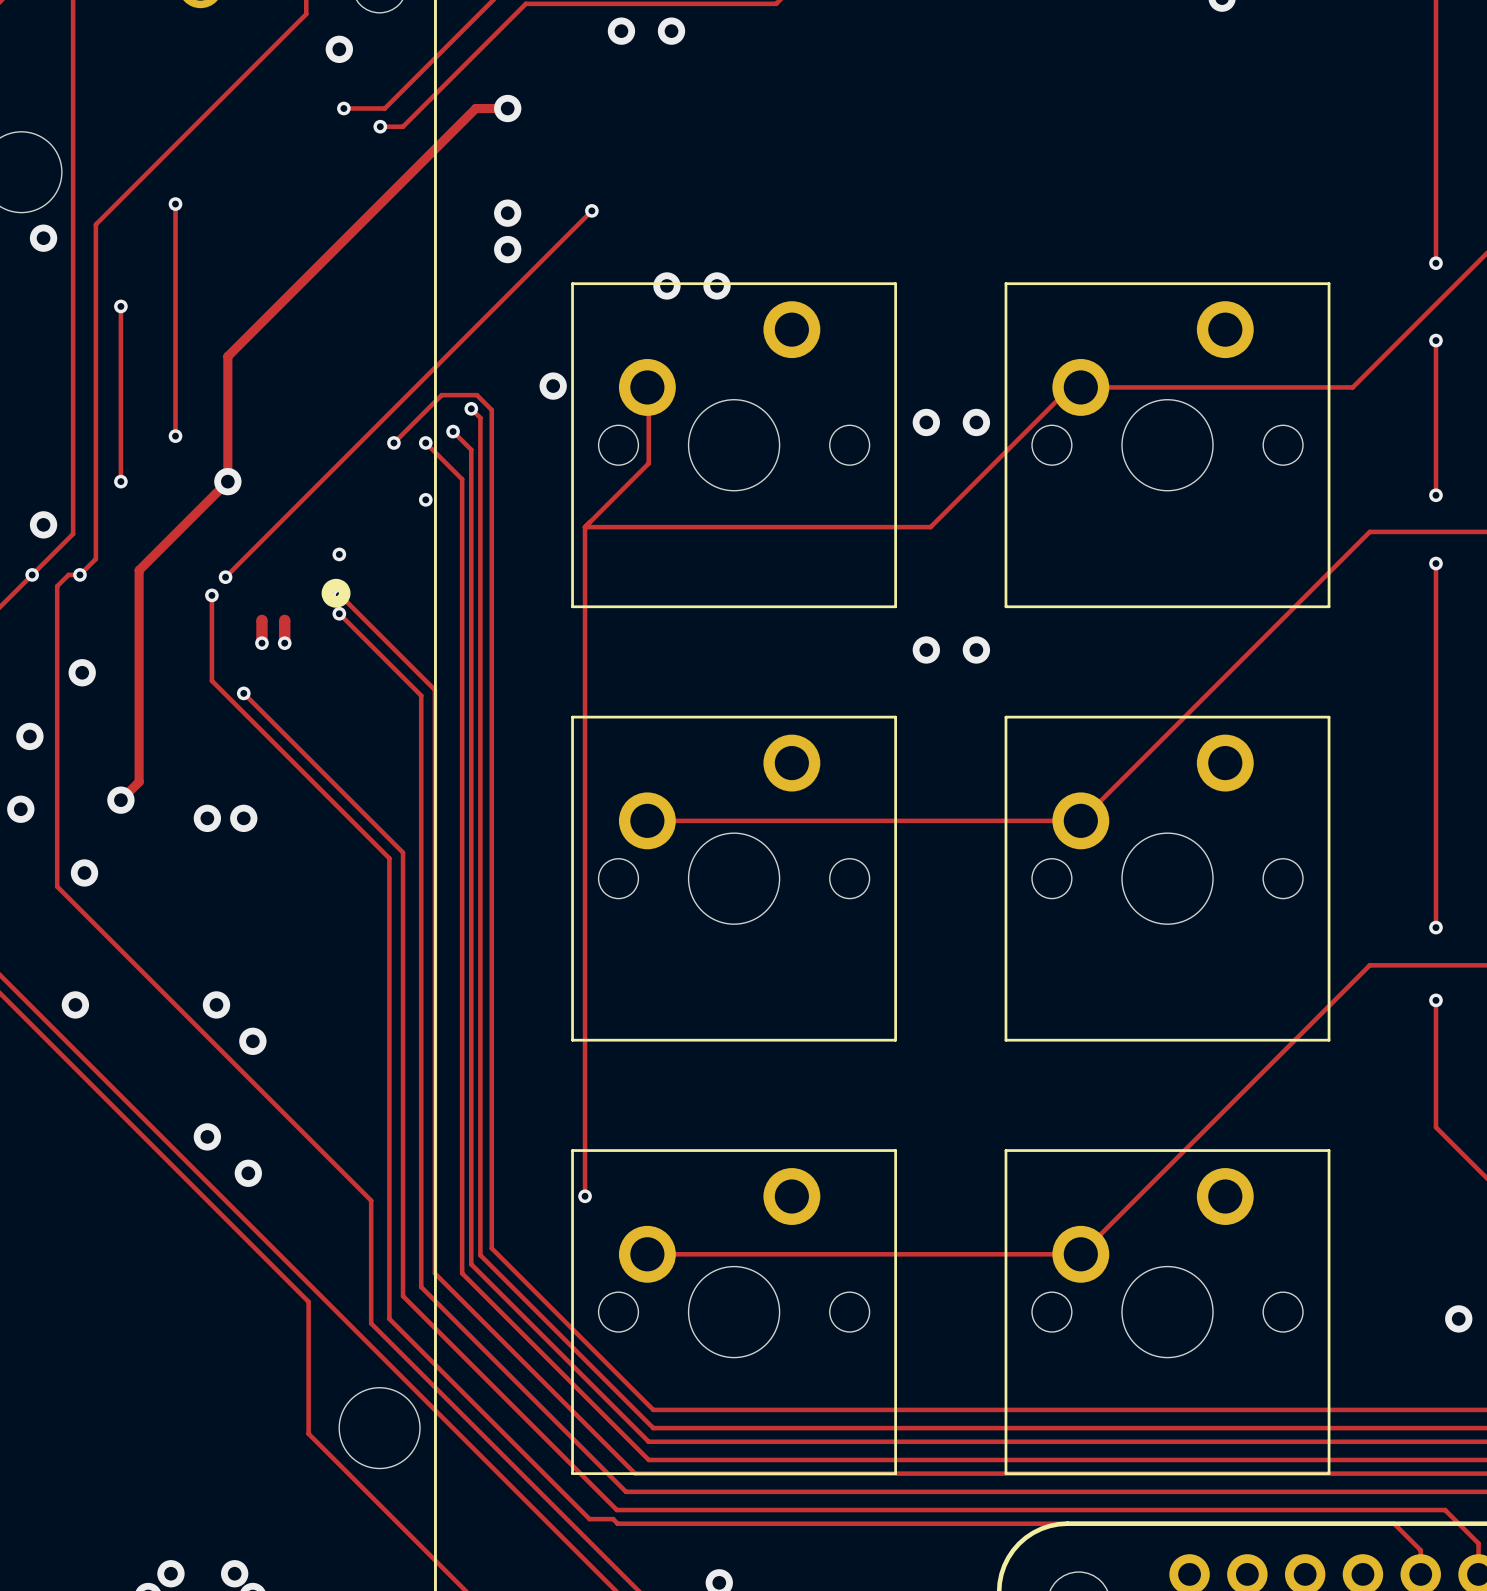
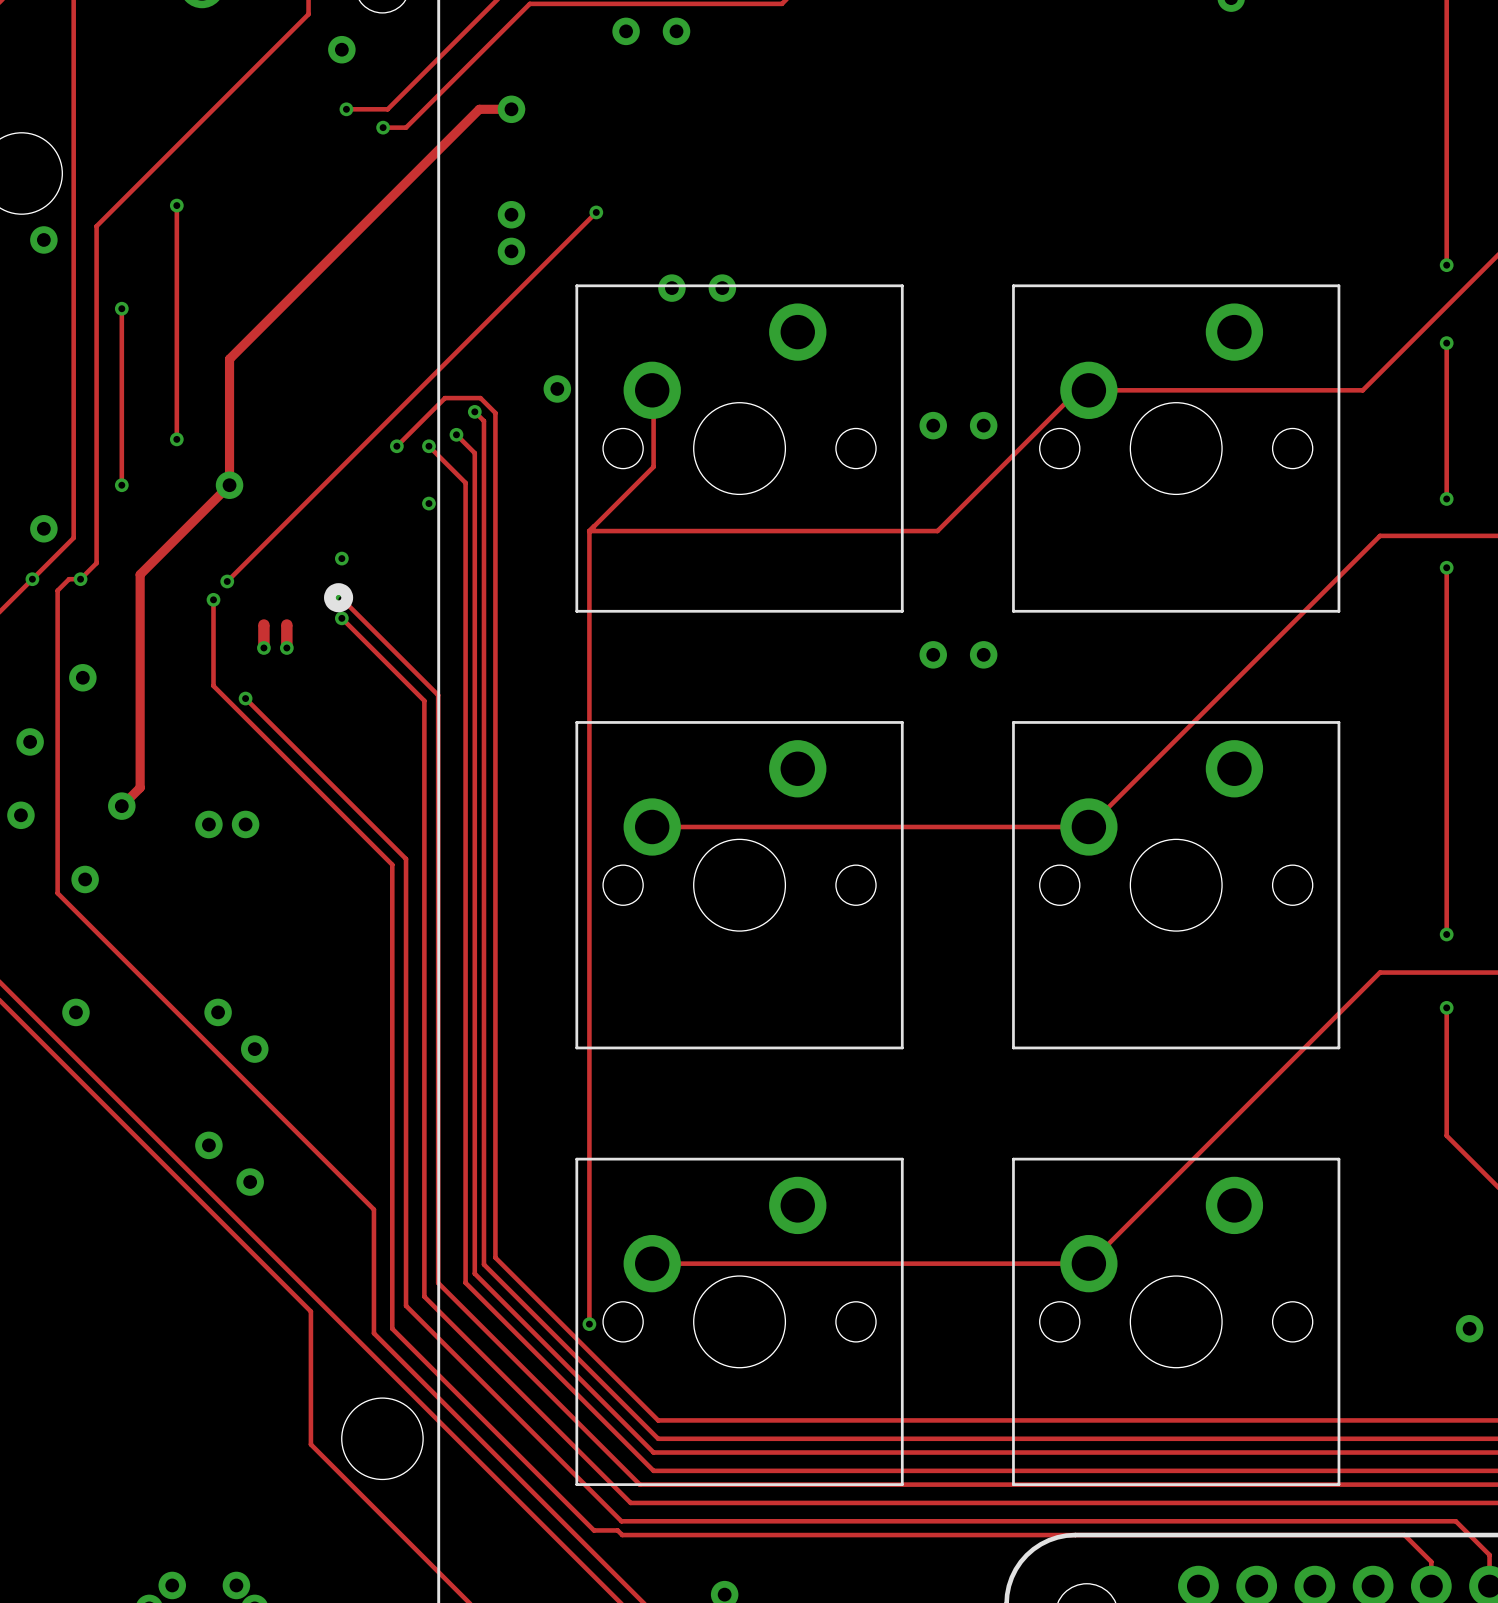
track: none -> (589, 1205) (589, 1324)
via position: (585, 1196) -> (589, 1324)

